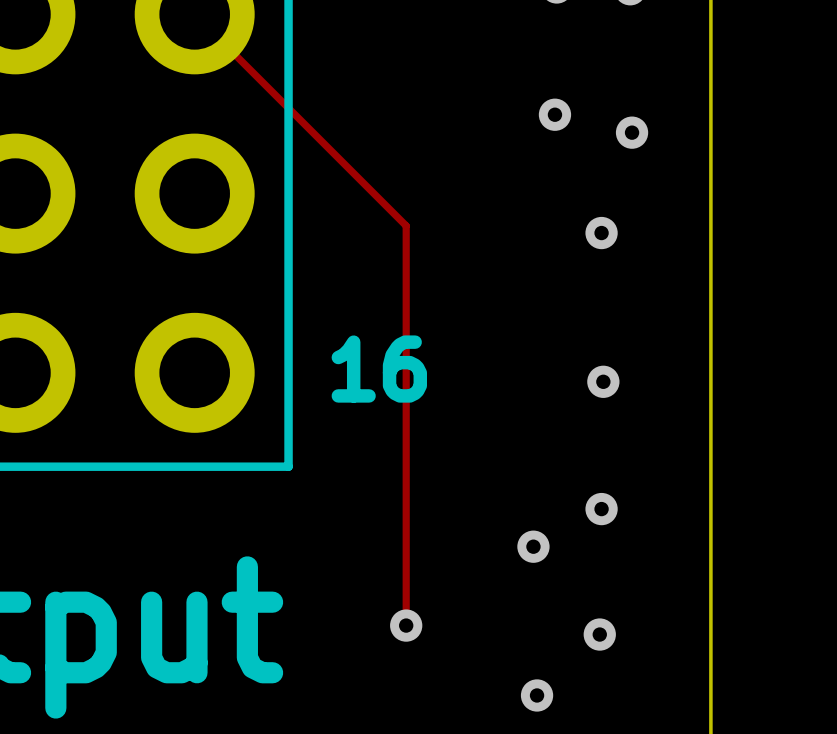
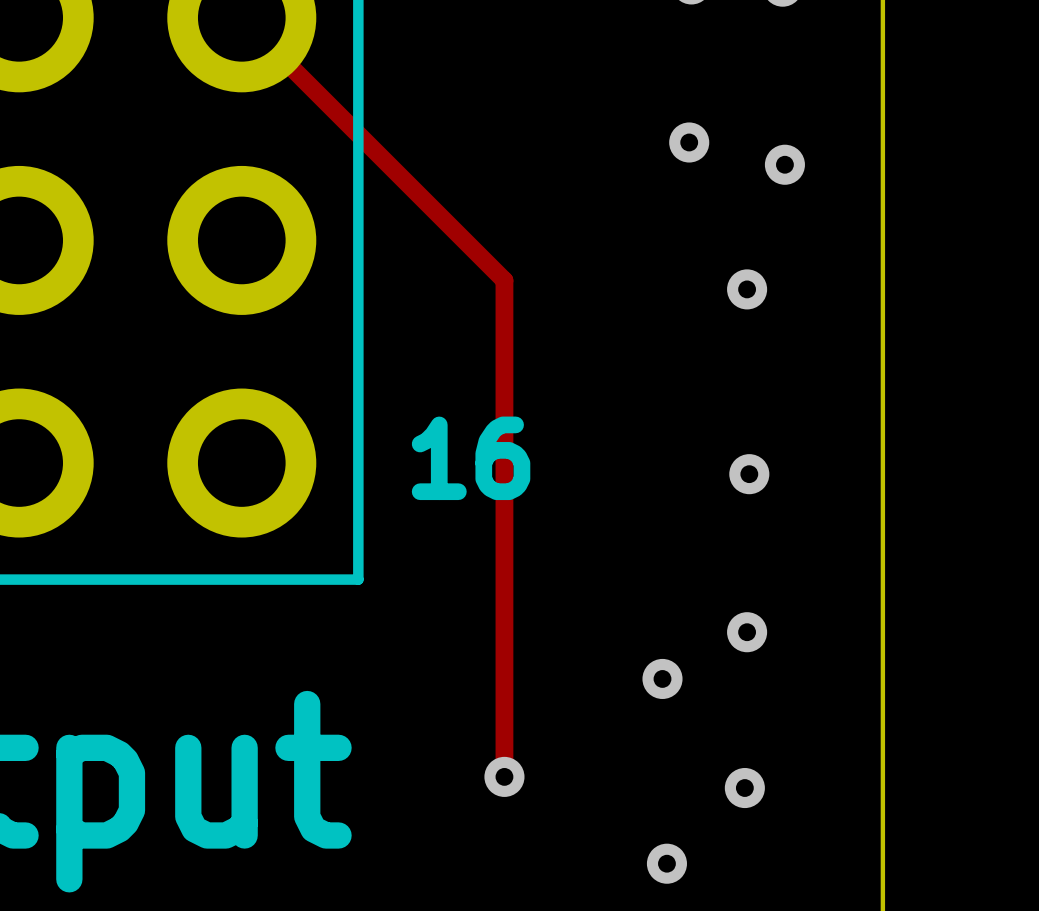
track width: thin (194, 14) (406, 225) (406, 625) -> thick (241, 17) (504, 280) (504, 776)

